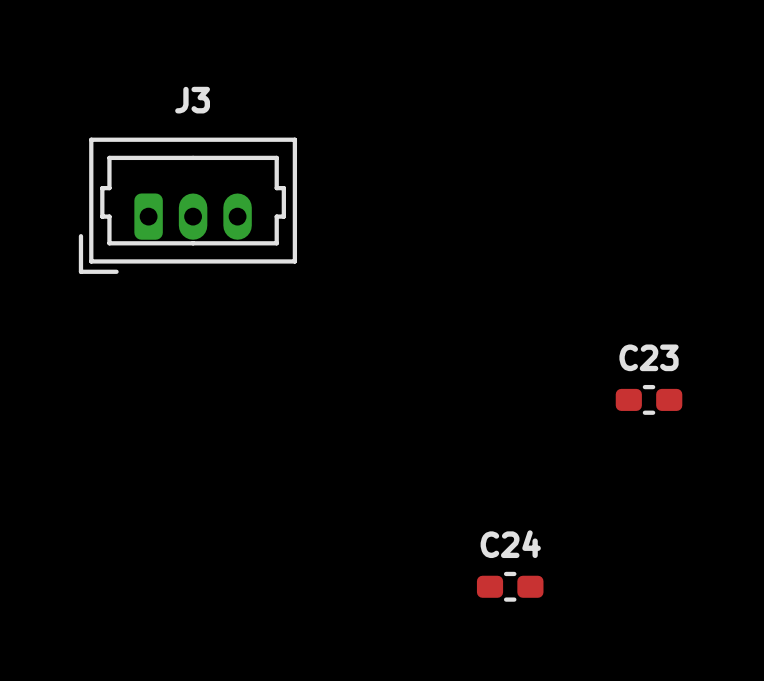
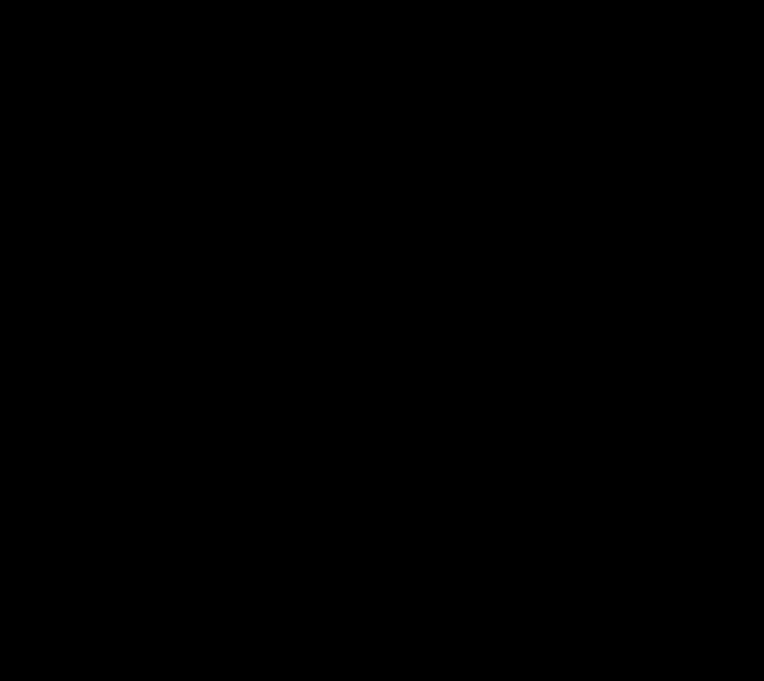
J3: (187, 205) -> none
C23: (649, 399) -> none
C24: (510, 586) -> none

